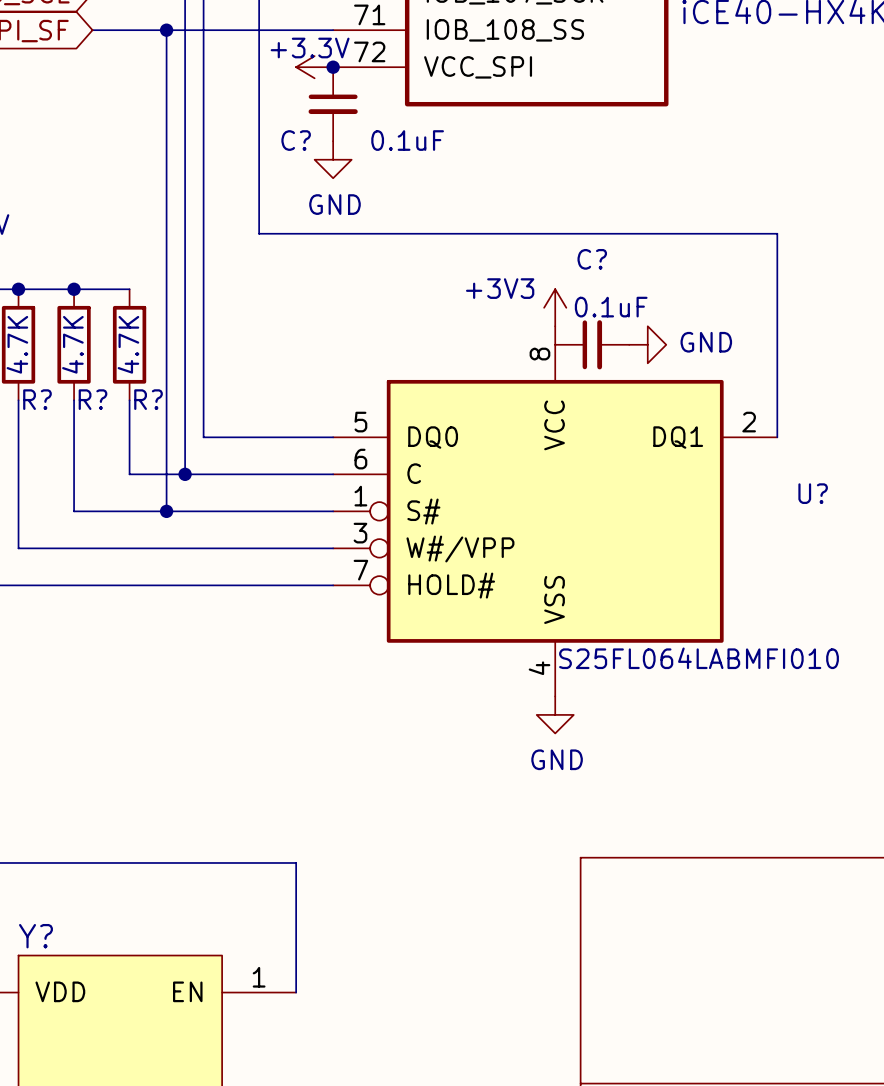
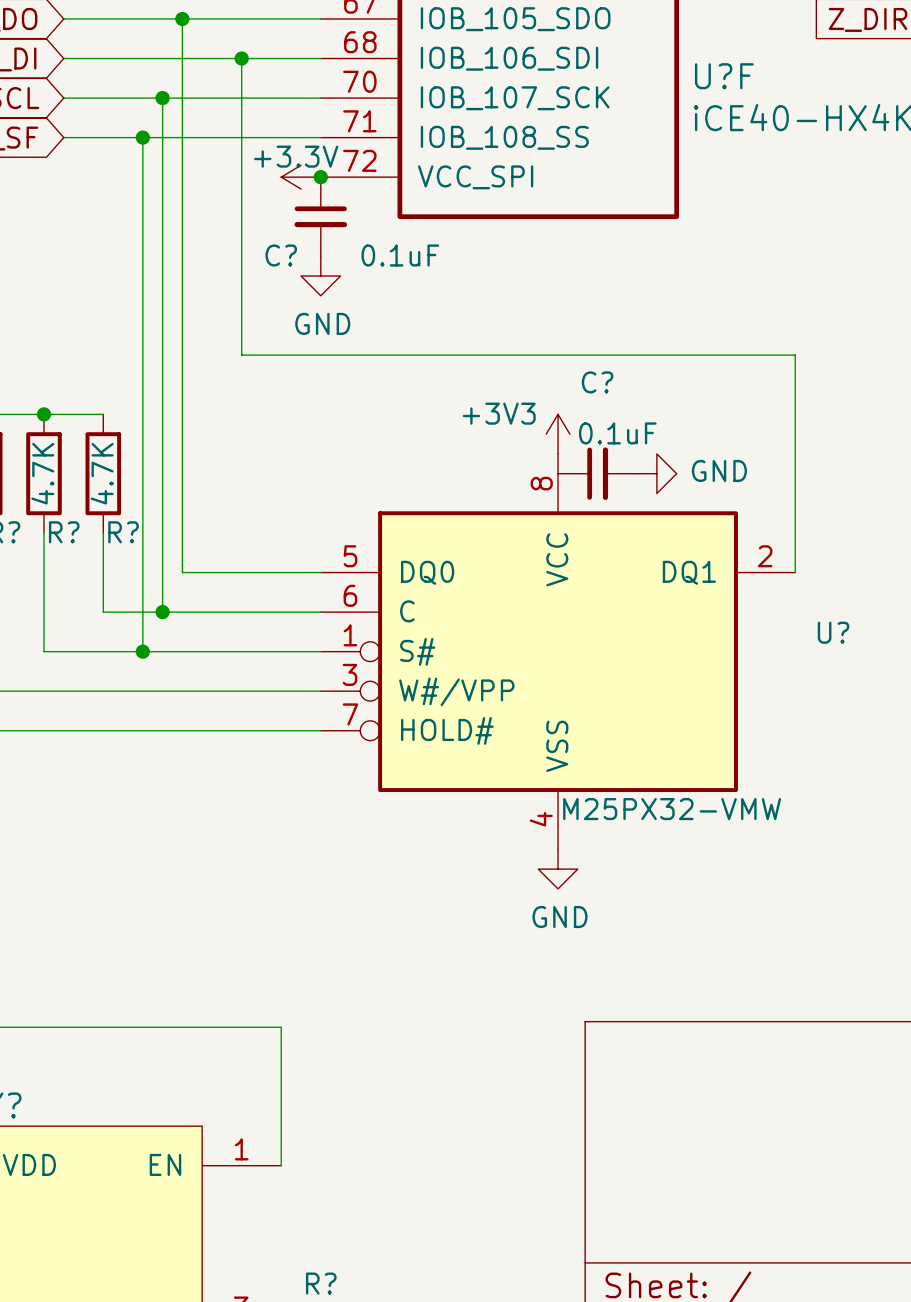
U? value: S25FL064LABMFI010 (699, 658) -> M25PX32-VMW (672, 809)

